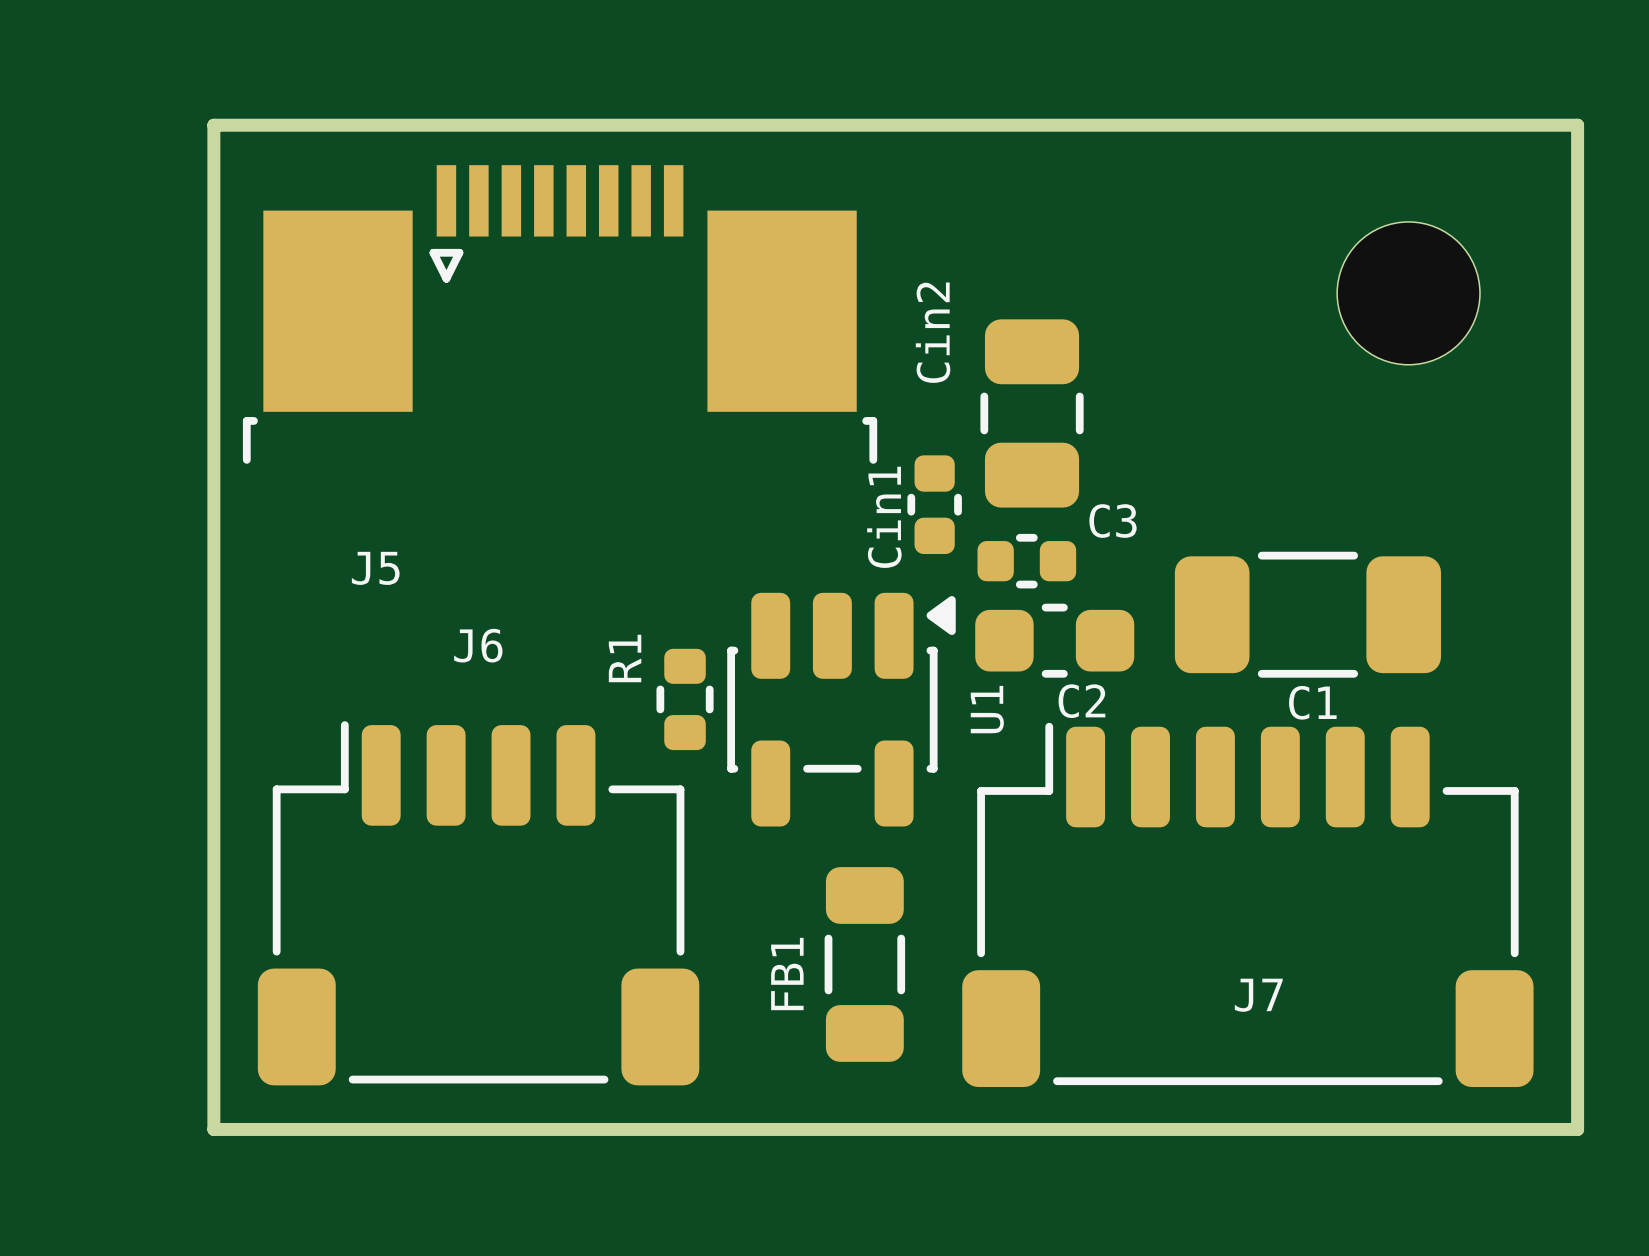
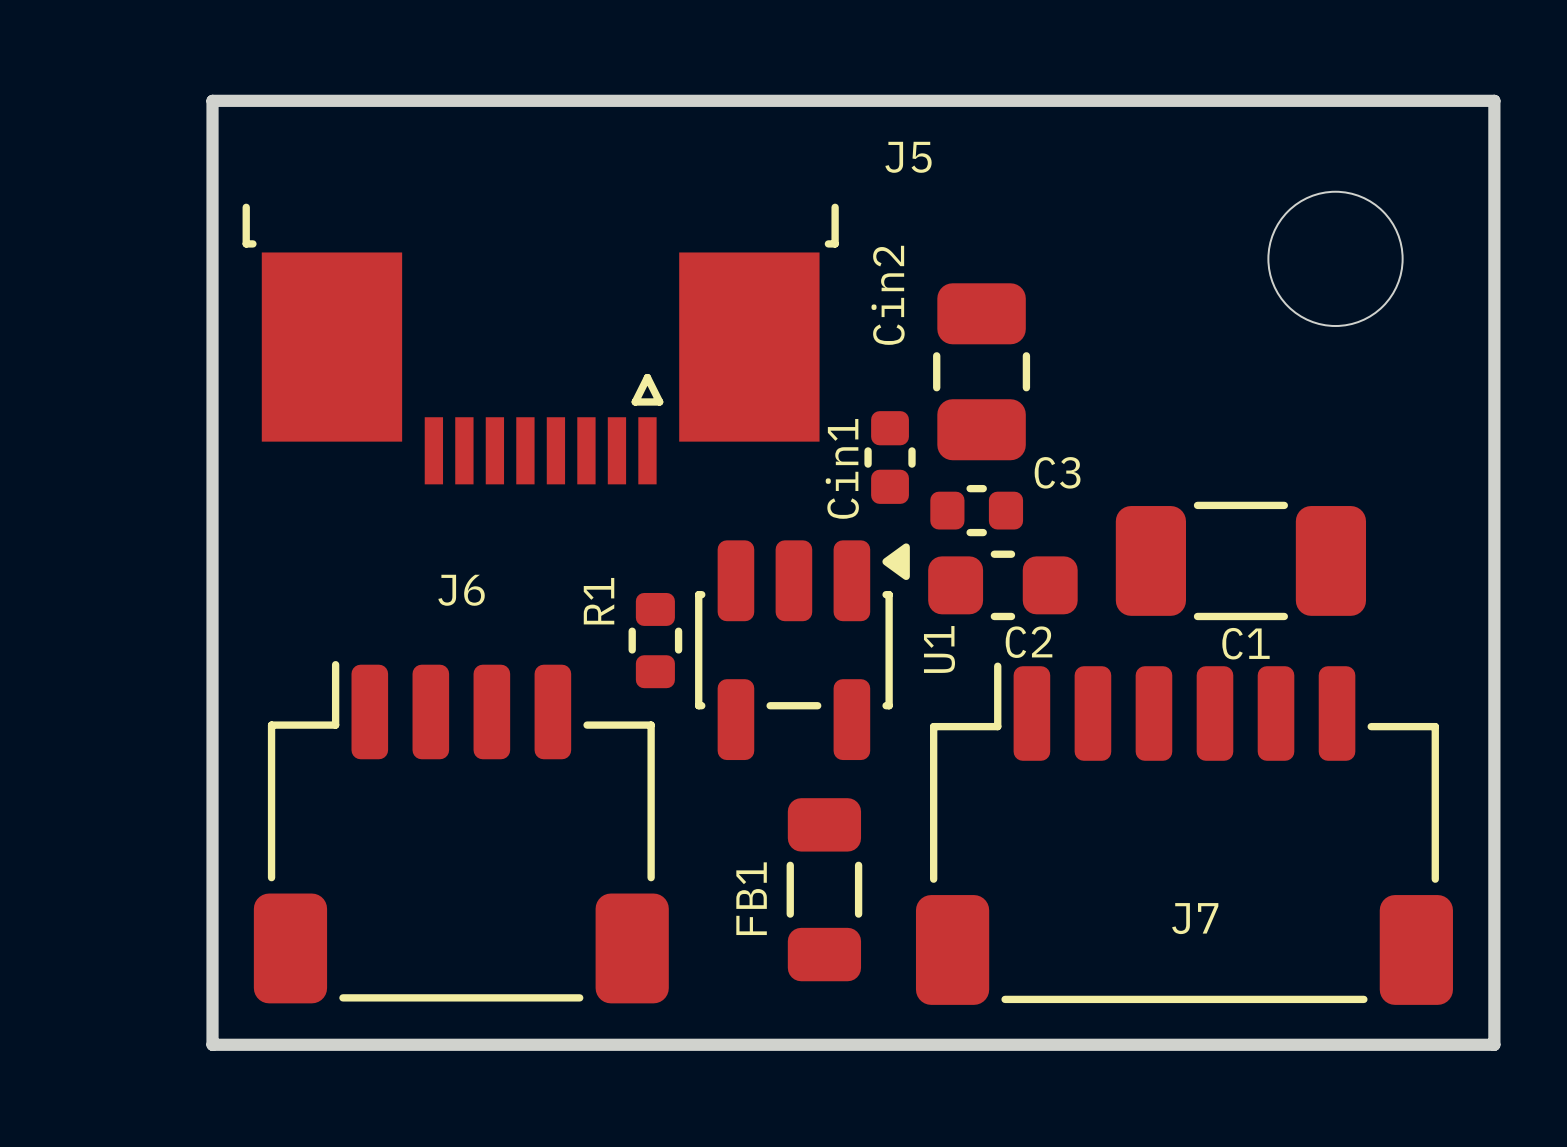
J5 rotation: 0° (560, 314) -> 180° (540, 344)
J5 name position: J5 (375, 568) -> J5 (908, 157)

